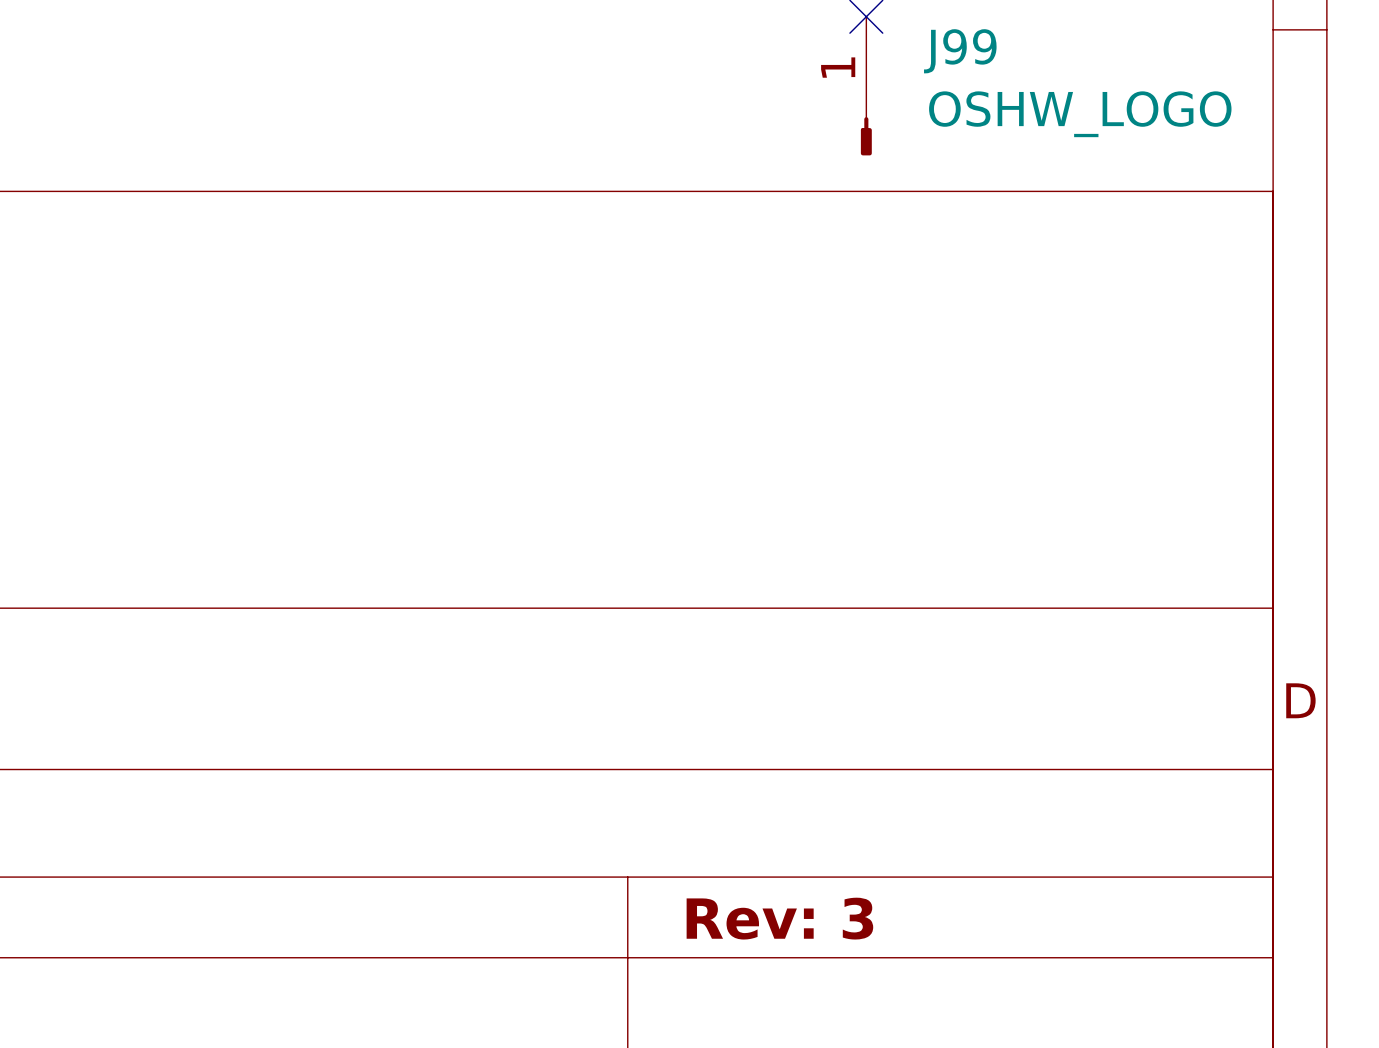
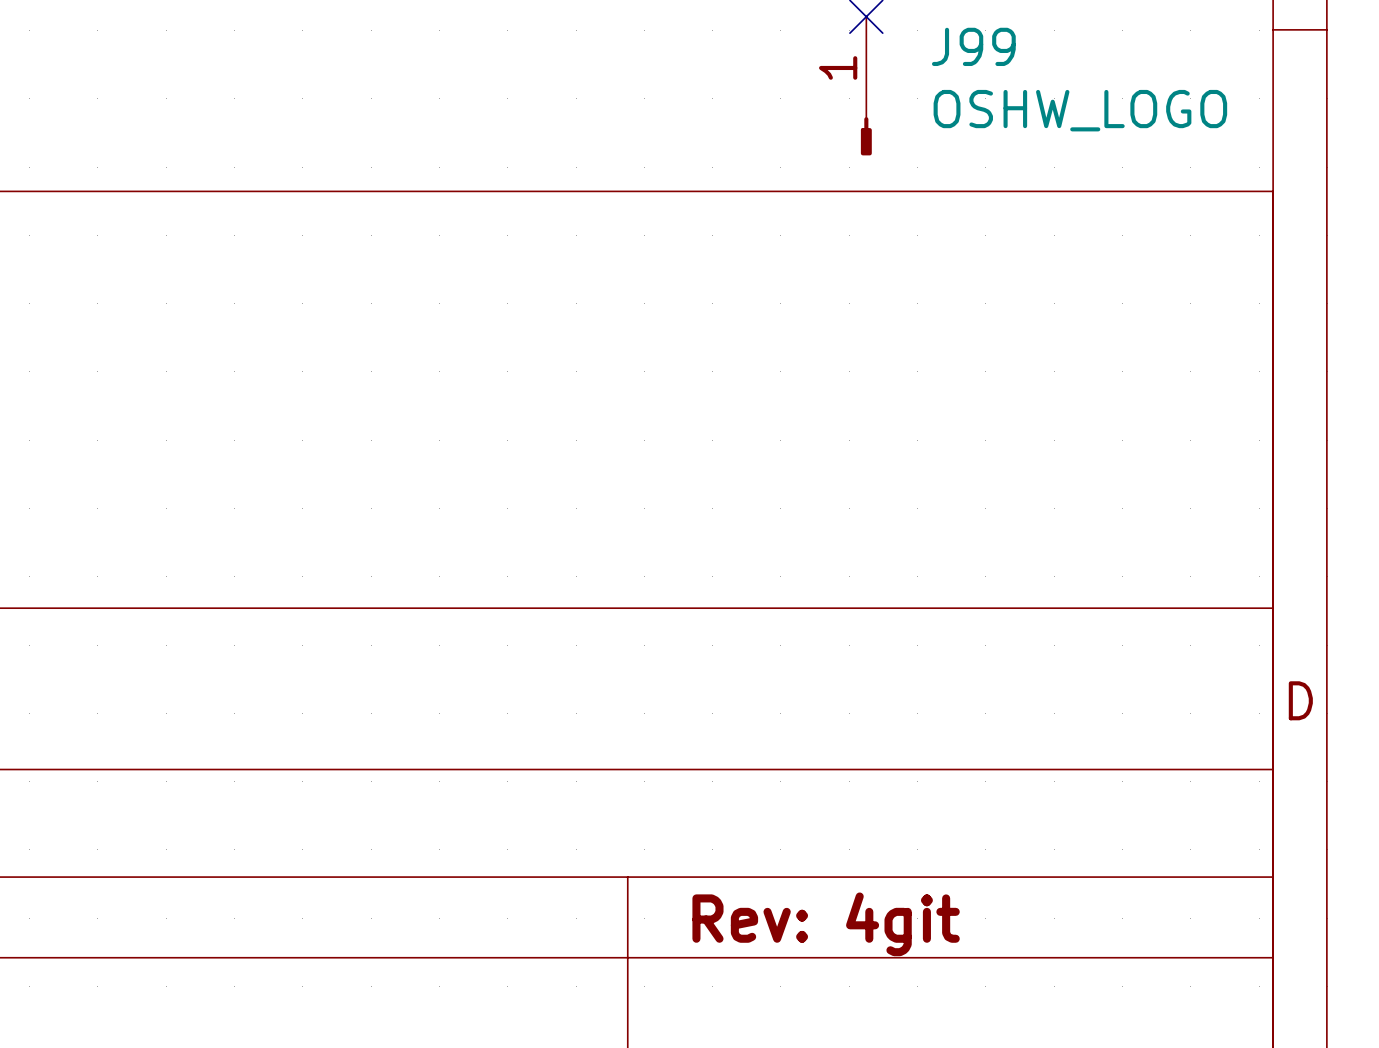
title block: Rev: 3 (779, 918) -> Rev: 4git (826, 924)

